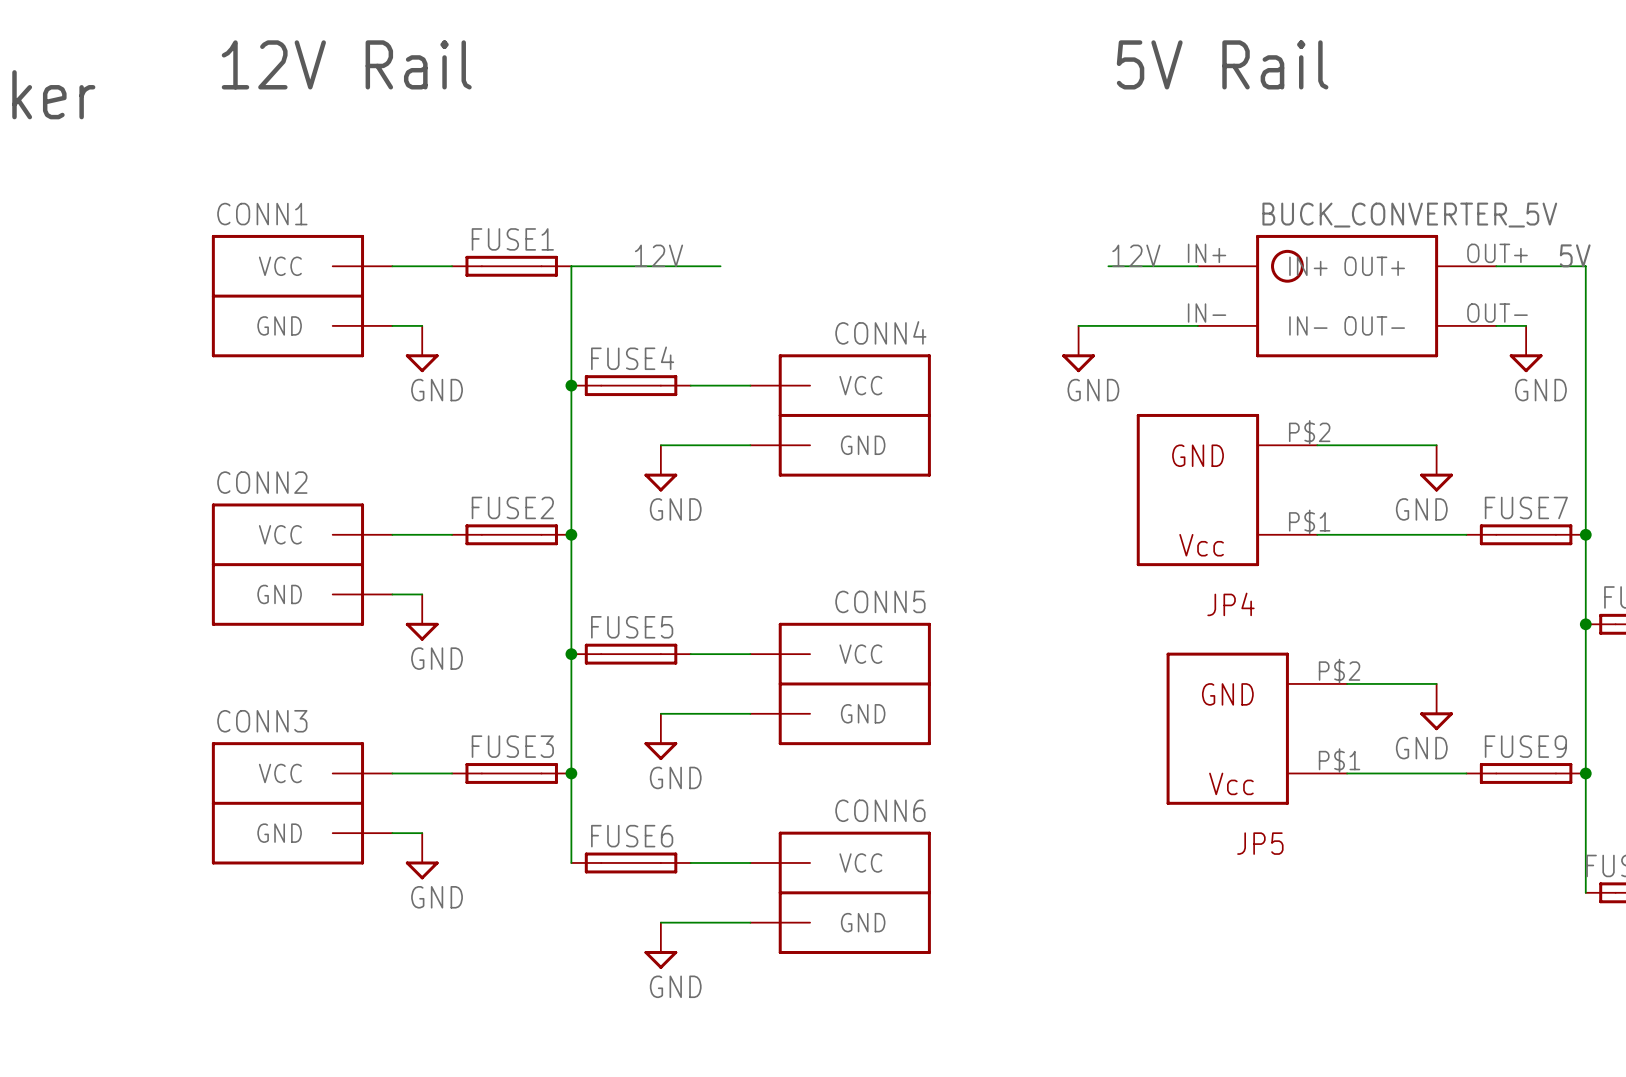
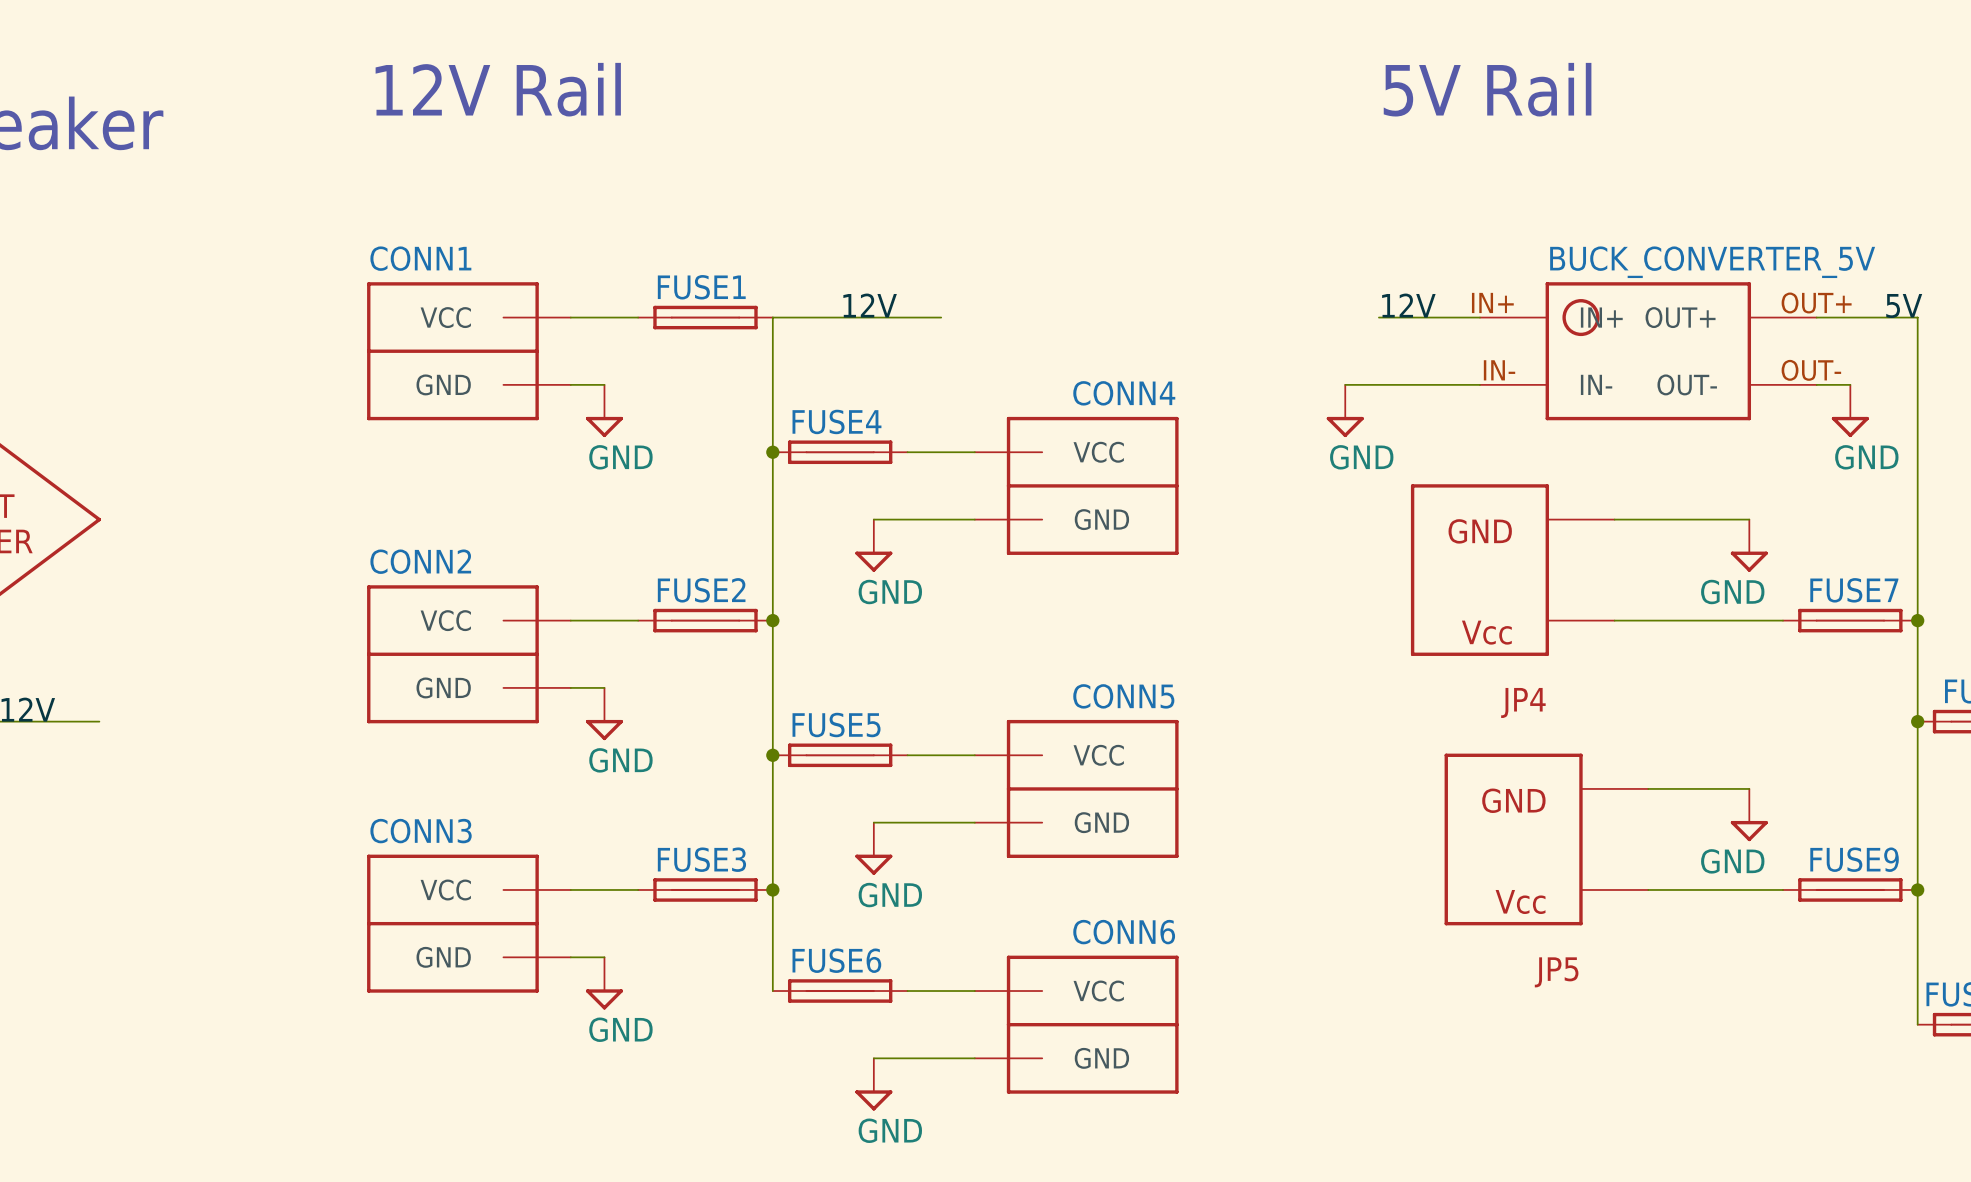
JP4 pin number: P$2 (1309, 432) -> none
JP4 pin number: P$1 (1309, 521) -> none
JP5 pin number: P$2 (1339, 671) -> none
JP5 pin number: P$1 (1339, 760) -> none

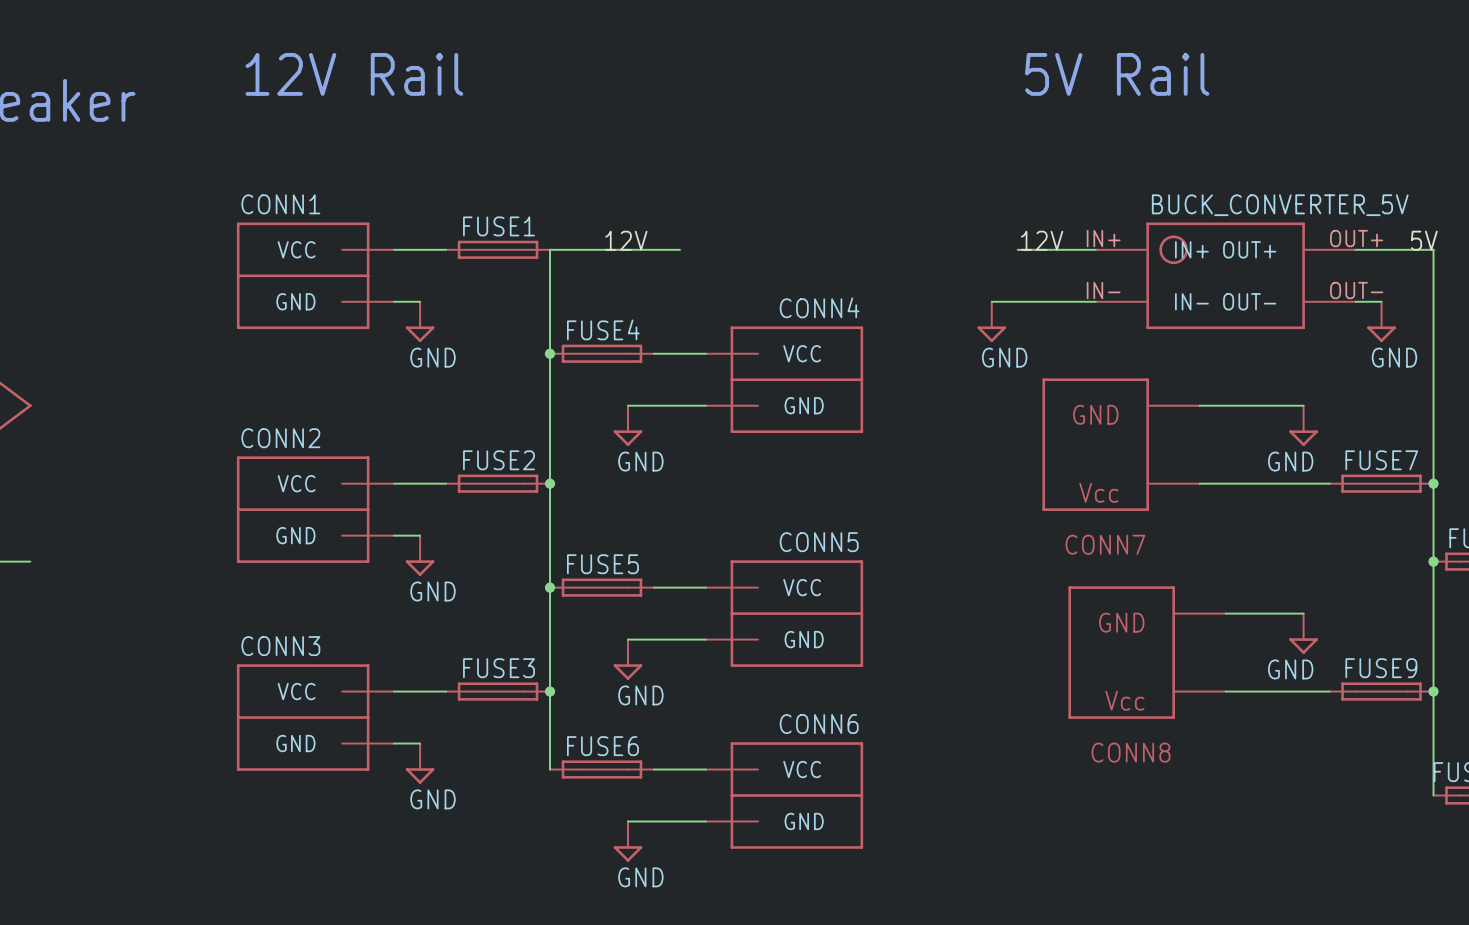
JP4 name: JP4 (1523, 702) -> CONN7 (1105, 544)
JP5 name: JP5 (1556, 972) -> CONN8 (1131, 752)

